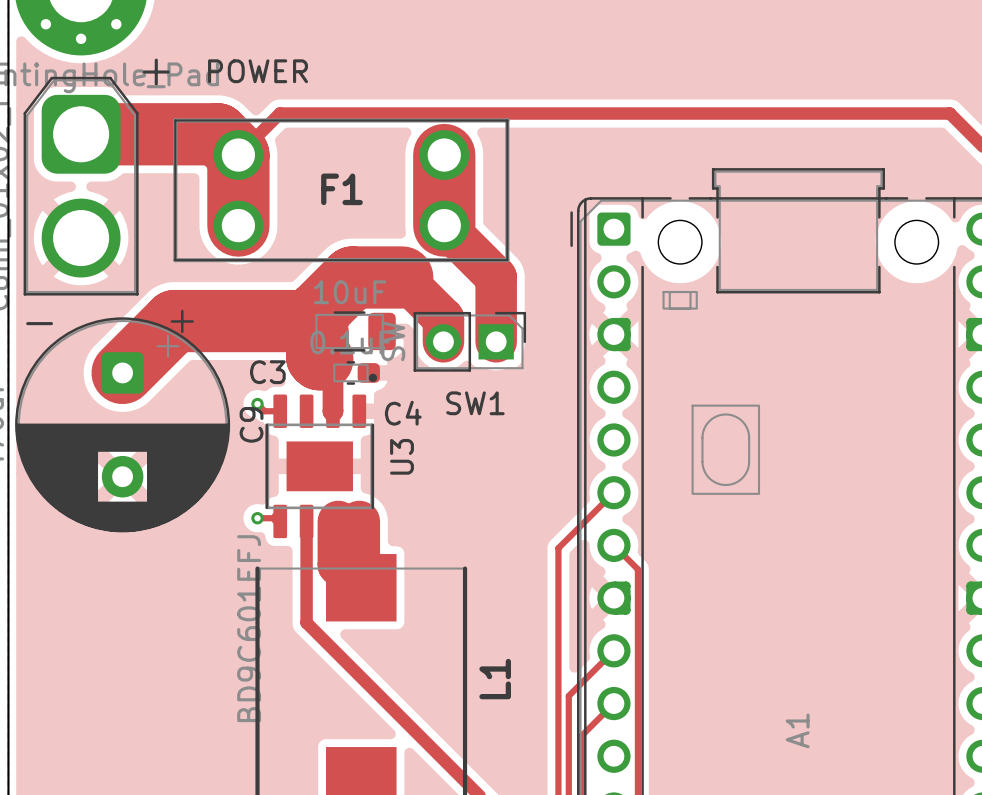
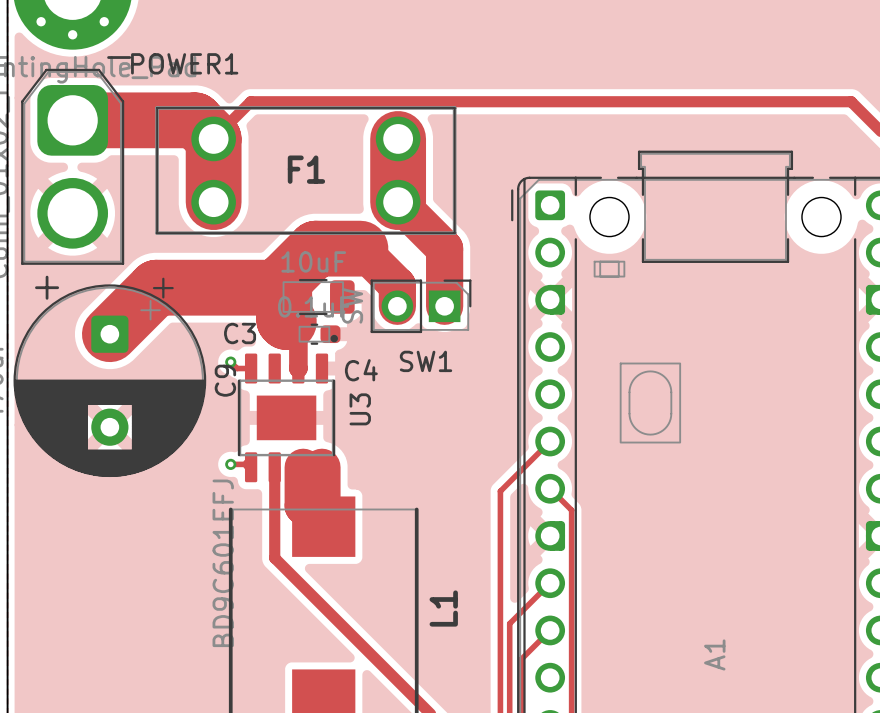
POWER name: POWER (258, 71) -> POWER1 (184, 63)
POWER text position: + (156, 72) -> + (47, 287)
POWER text position: - (39, 323) -> - (119, 57)

